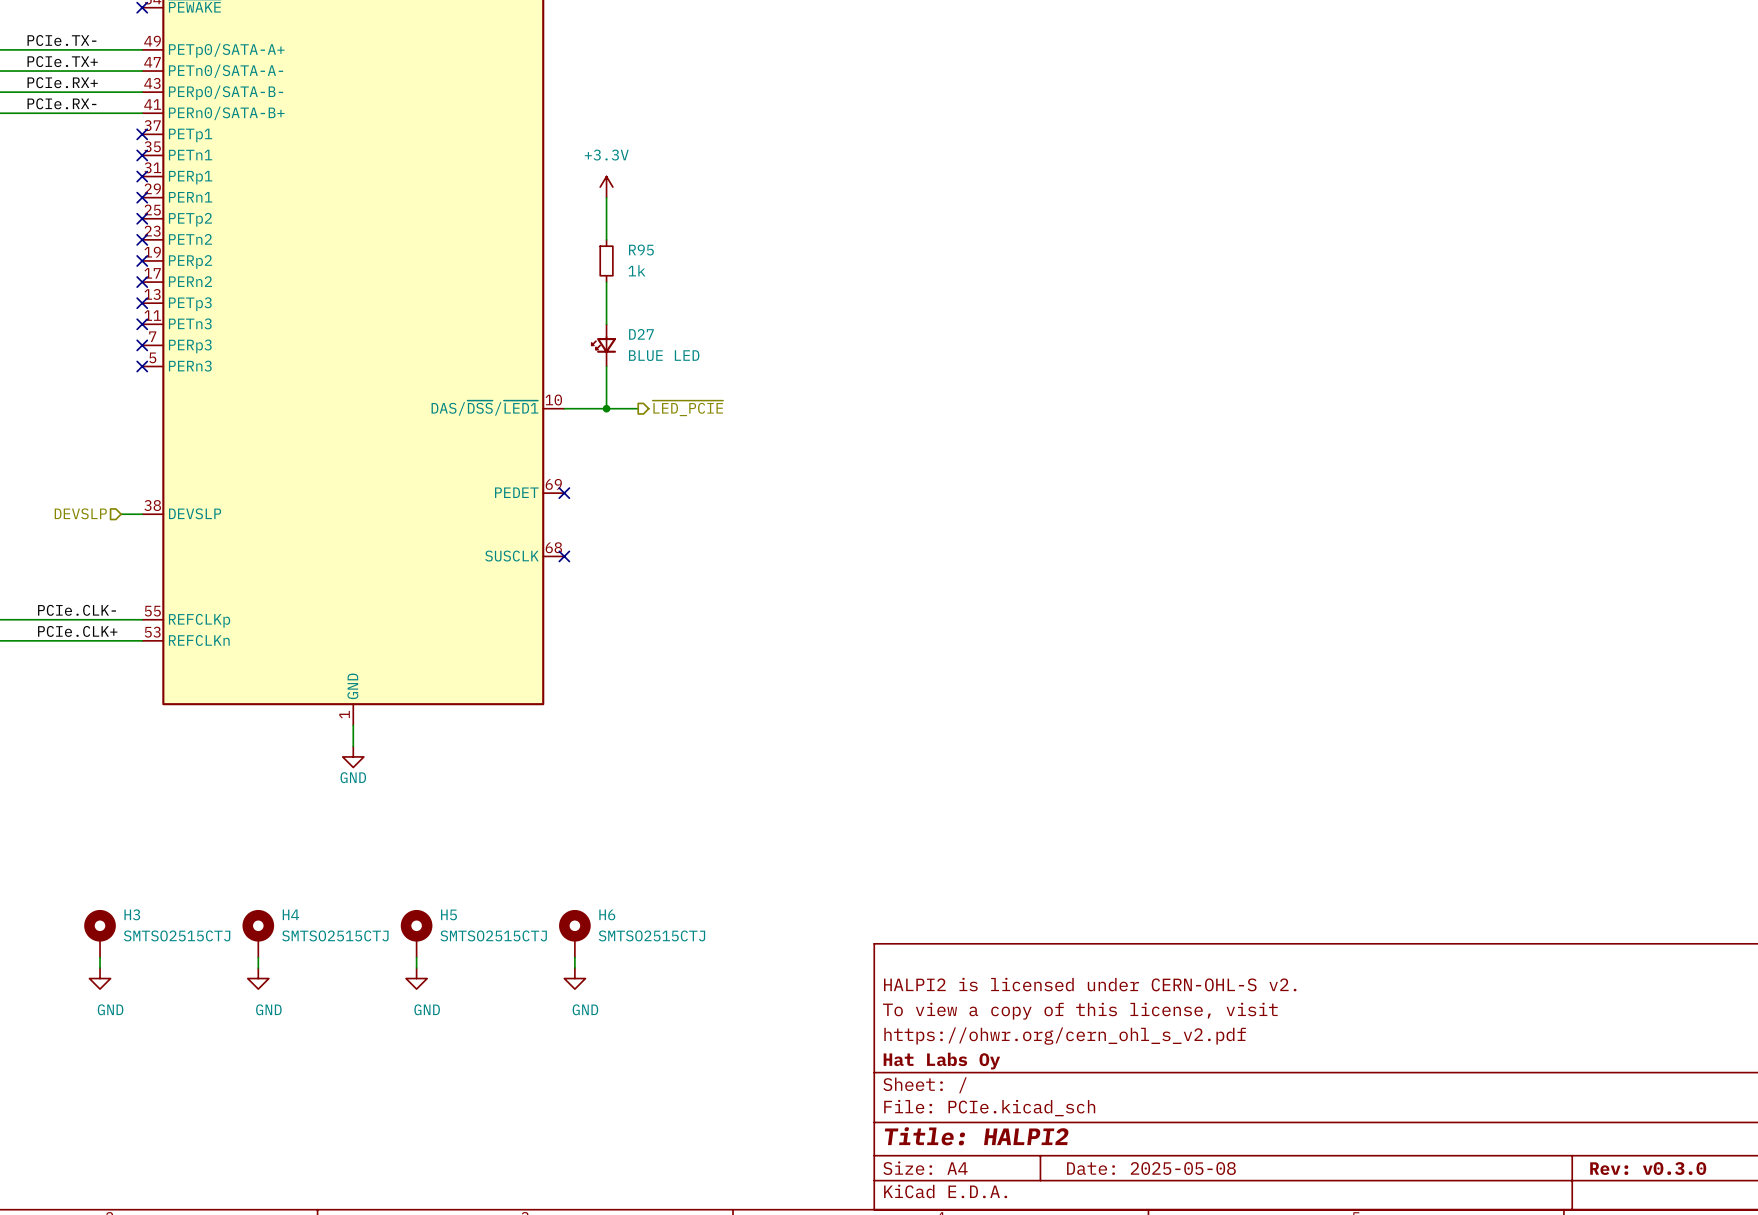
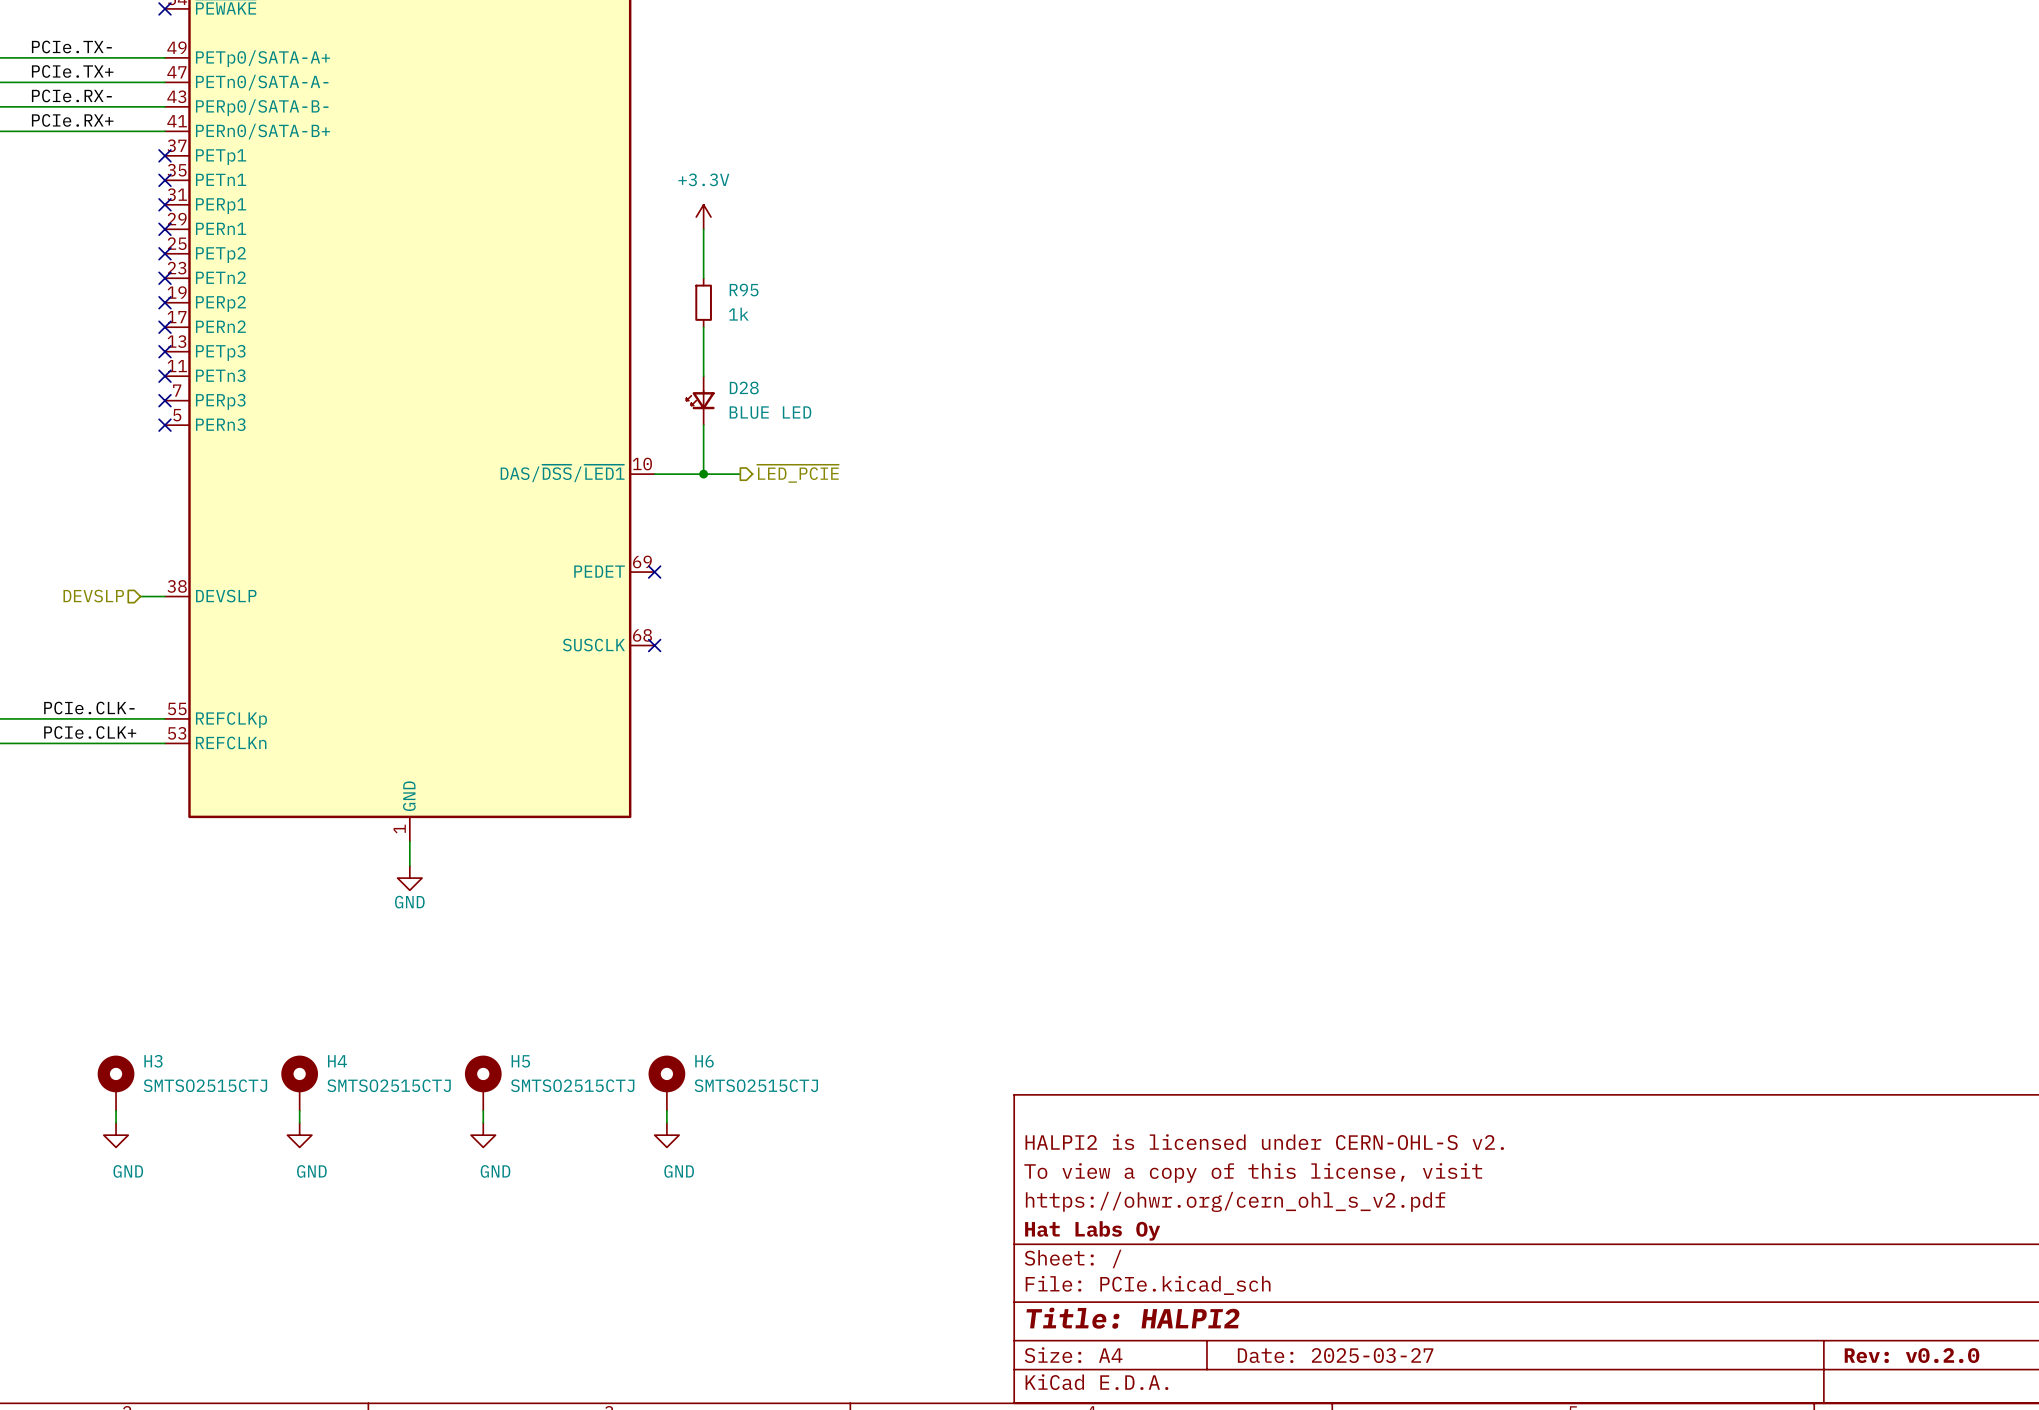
label: PCIe.RX+ (62, 82) -> PCIe.RX- (71, 95)
label: PCIe.RX- (61, 103) -> PCIe.RX+ (72, 120)
D27 name: D27 (641, 334) -> D28 (744, 387)
title block: Date: 2025-05-08 (1151, 1168) -> Date: 2025-03-27 (1335, 1355)
title block: Rev: v0.3.0 (1648, 1168) -> Rev: v0.2.0 (1912, 1355)

